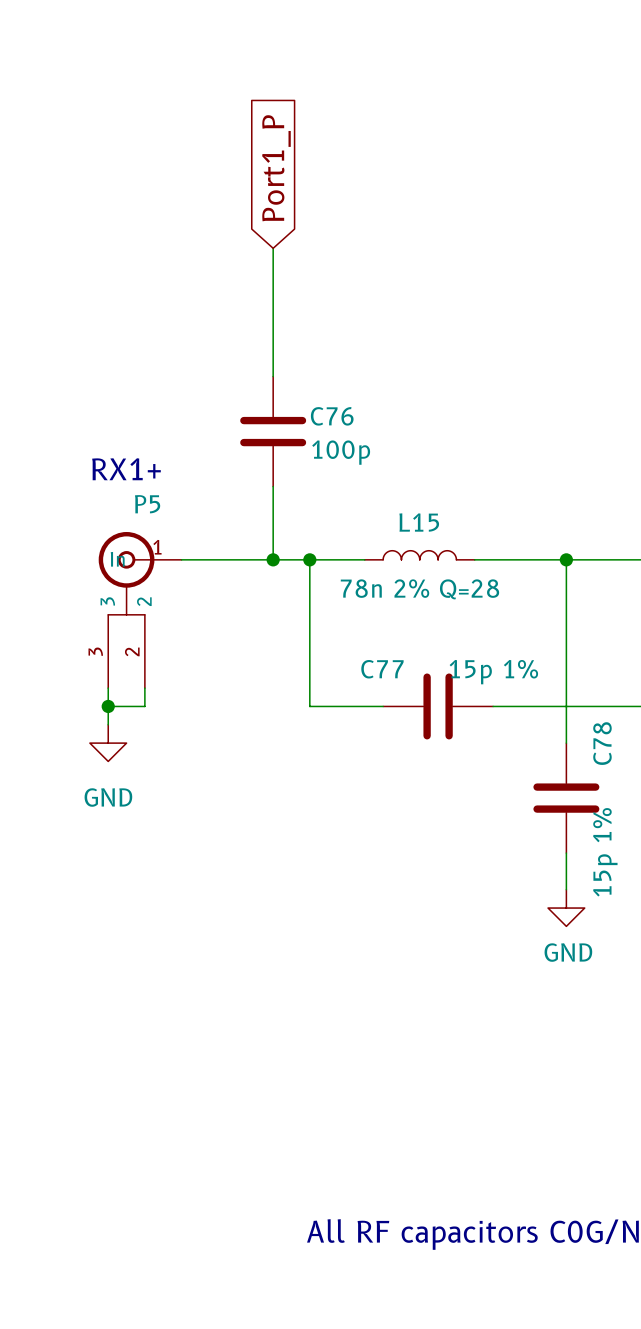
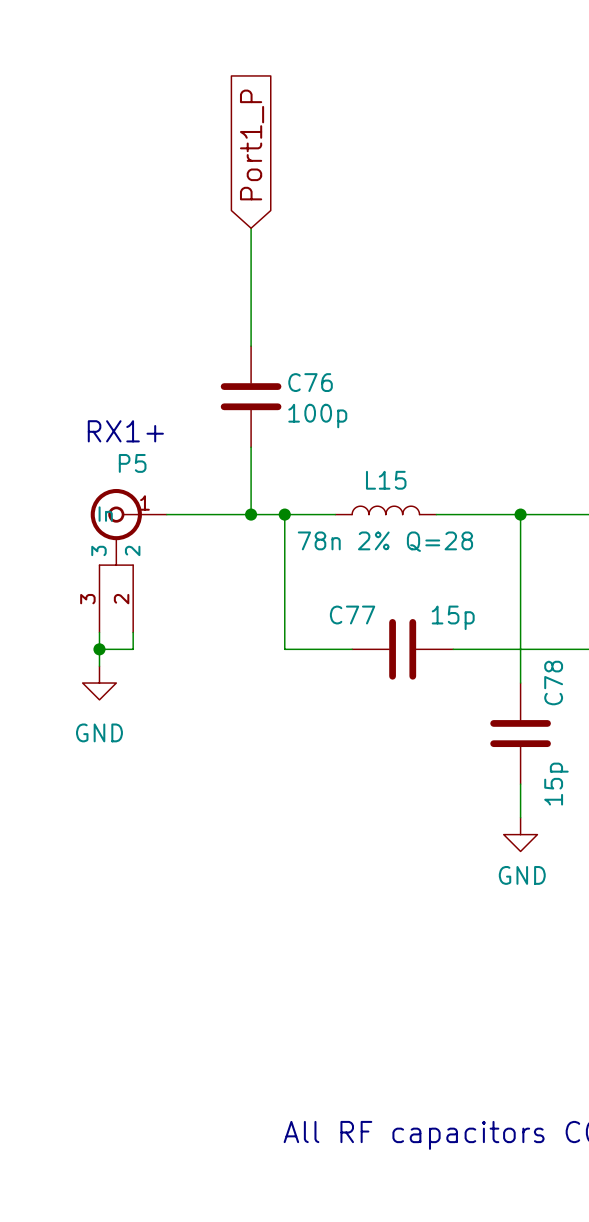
C77 value: 15p 1% (493, 672) -> 15p (453, 617)
C78 value: 15p 1% (605, 852) -> 15p (556, 784)

